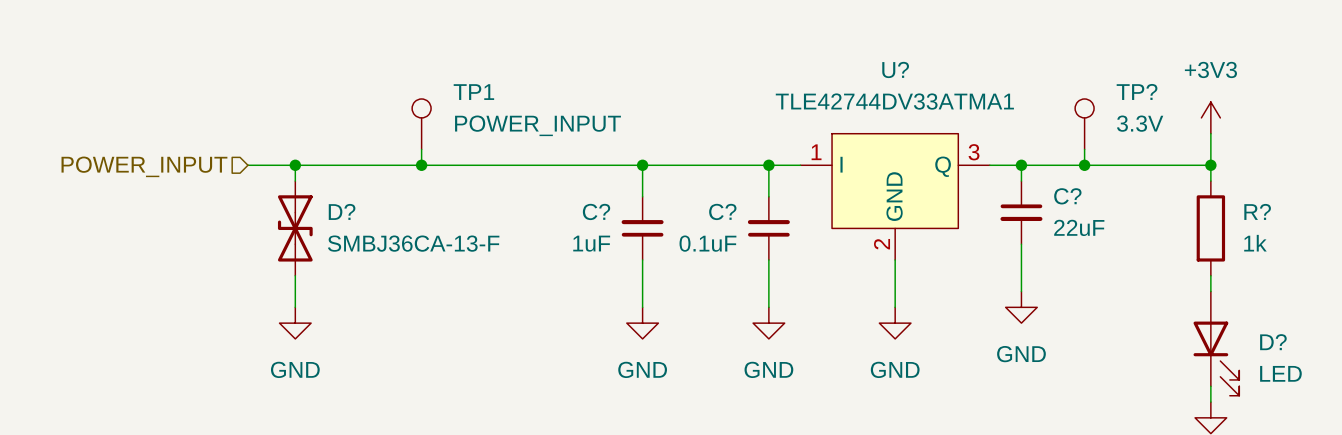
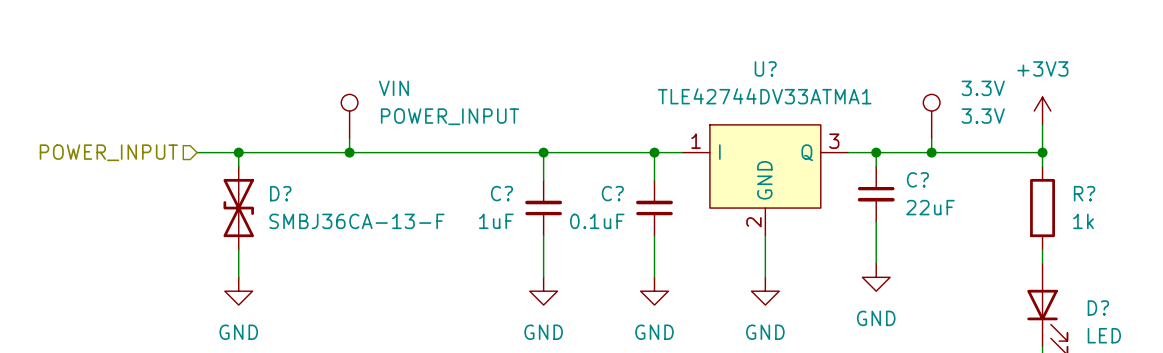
TP? name: TP? (1137, 91) -> 3.3V (983, 88)
TP1 name: TP1 (473, 92) -> VIN (393, 88)

